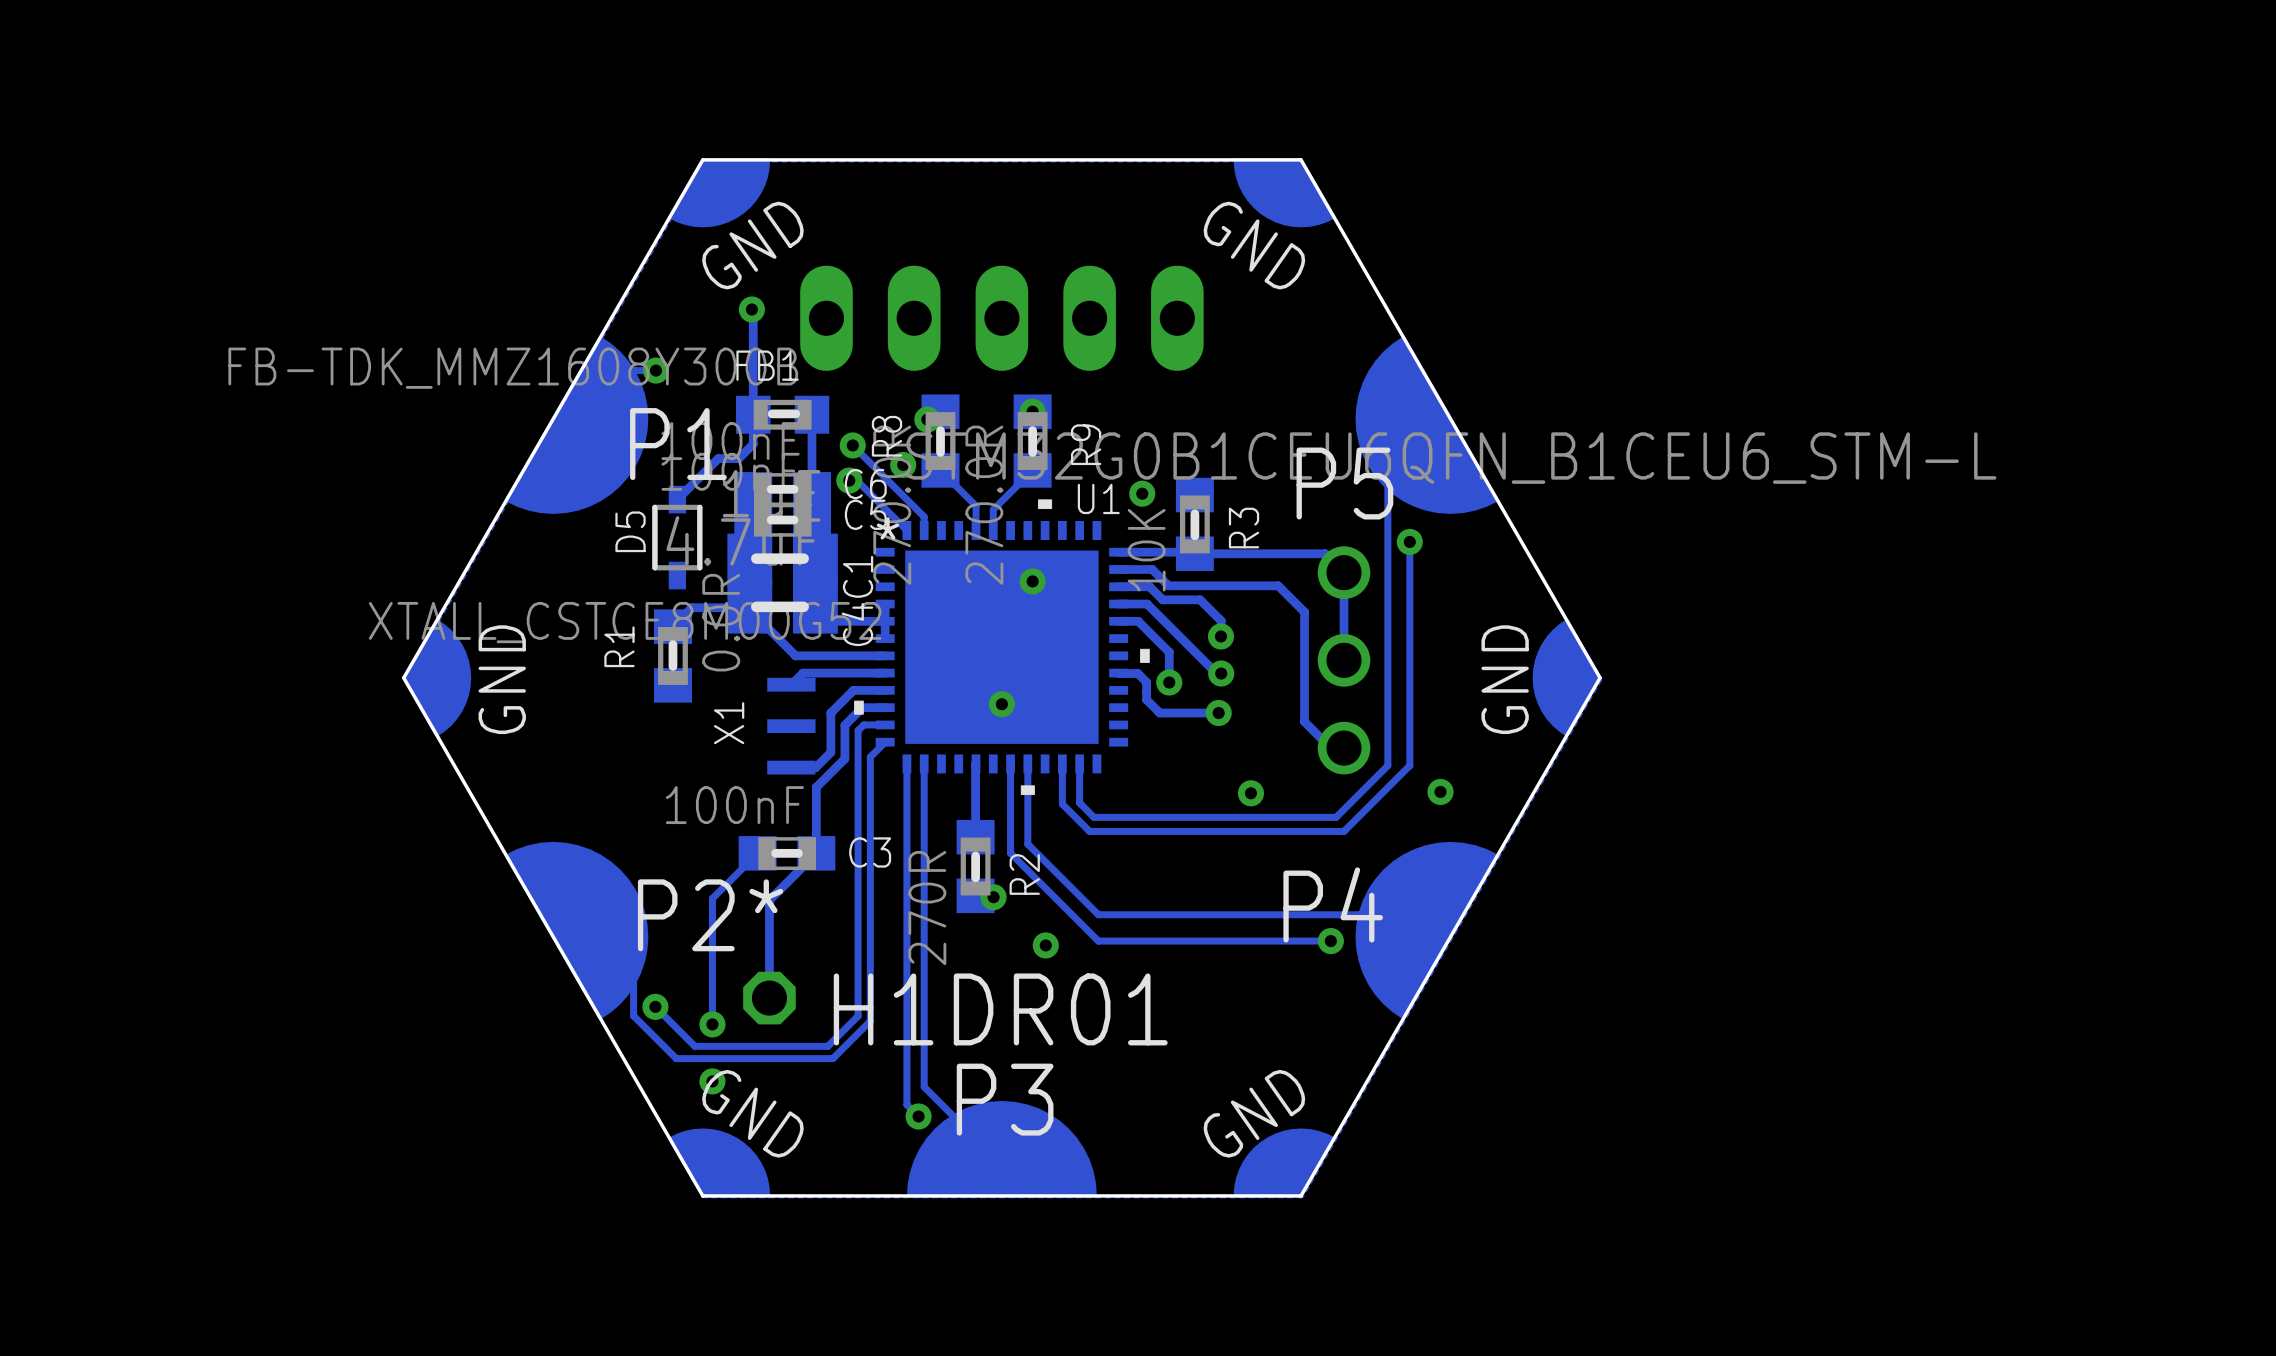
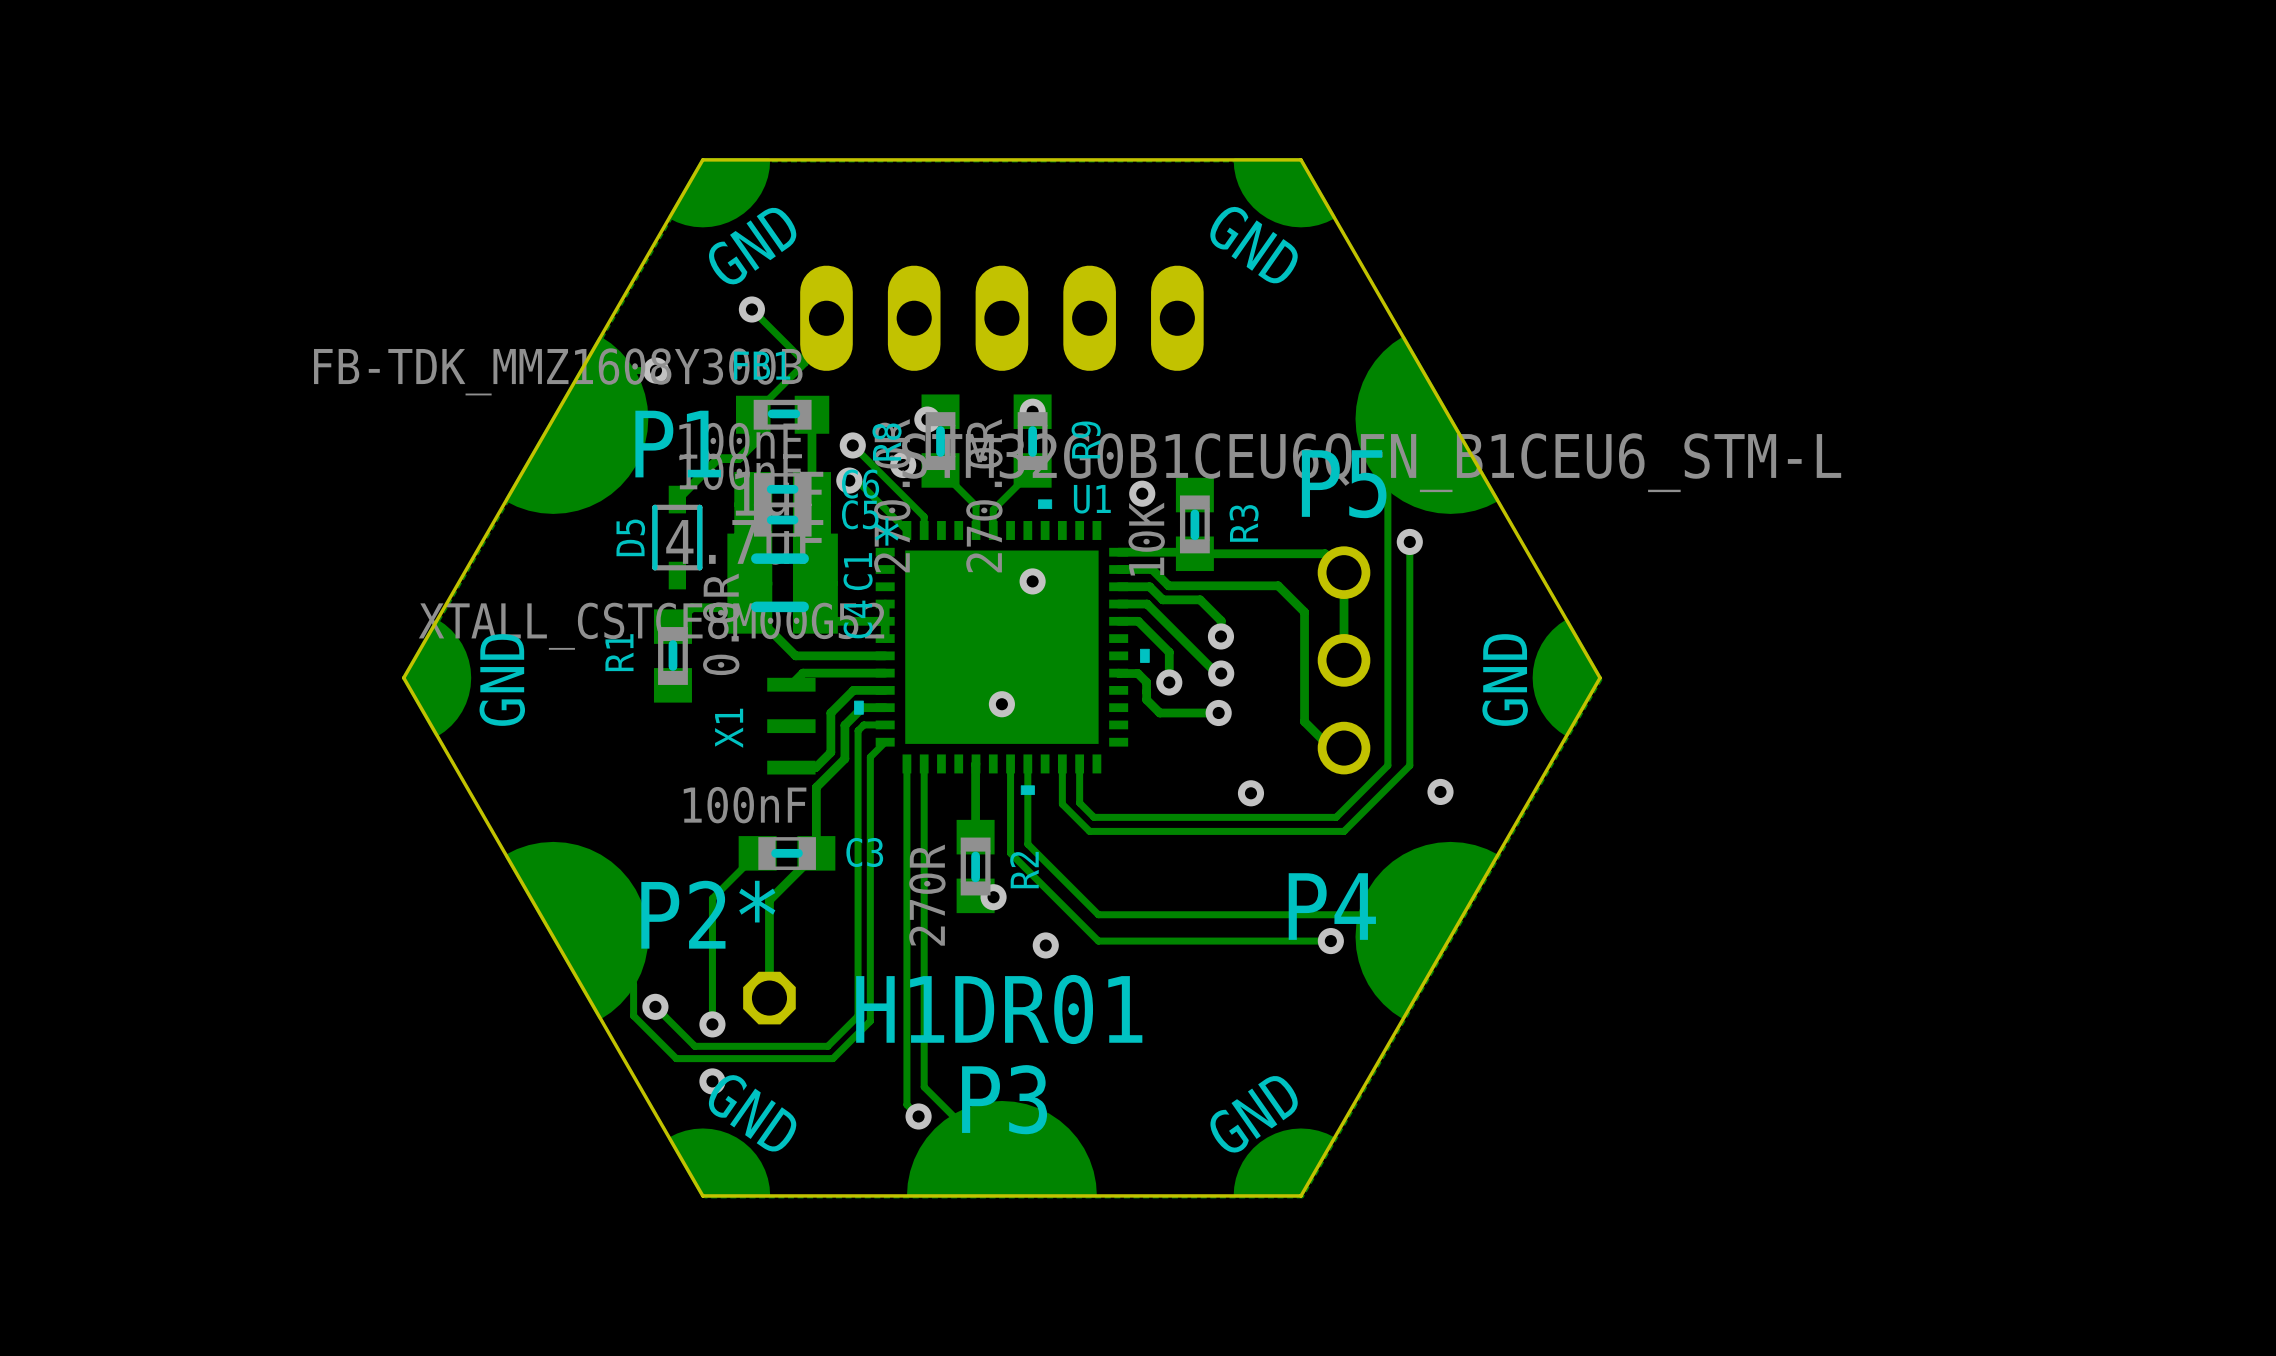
track: (753, 310) (753, 414) -> (751, 309) (805, 362) (753, 414)

